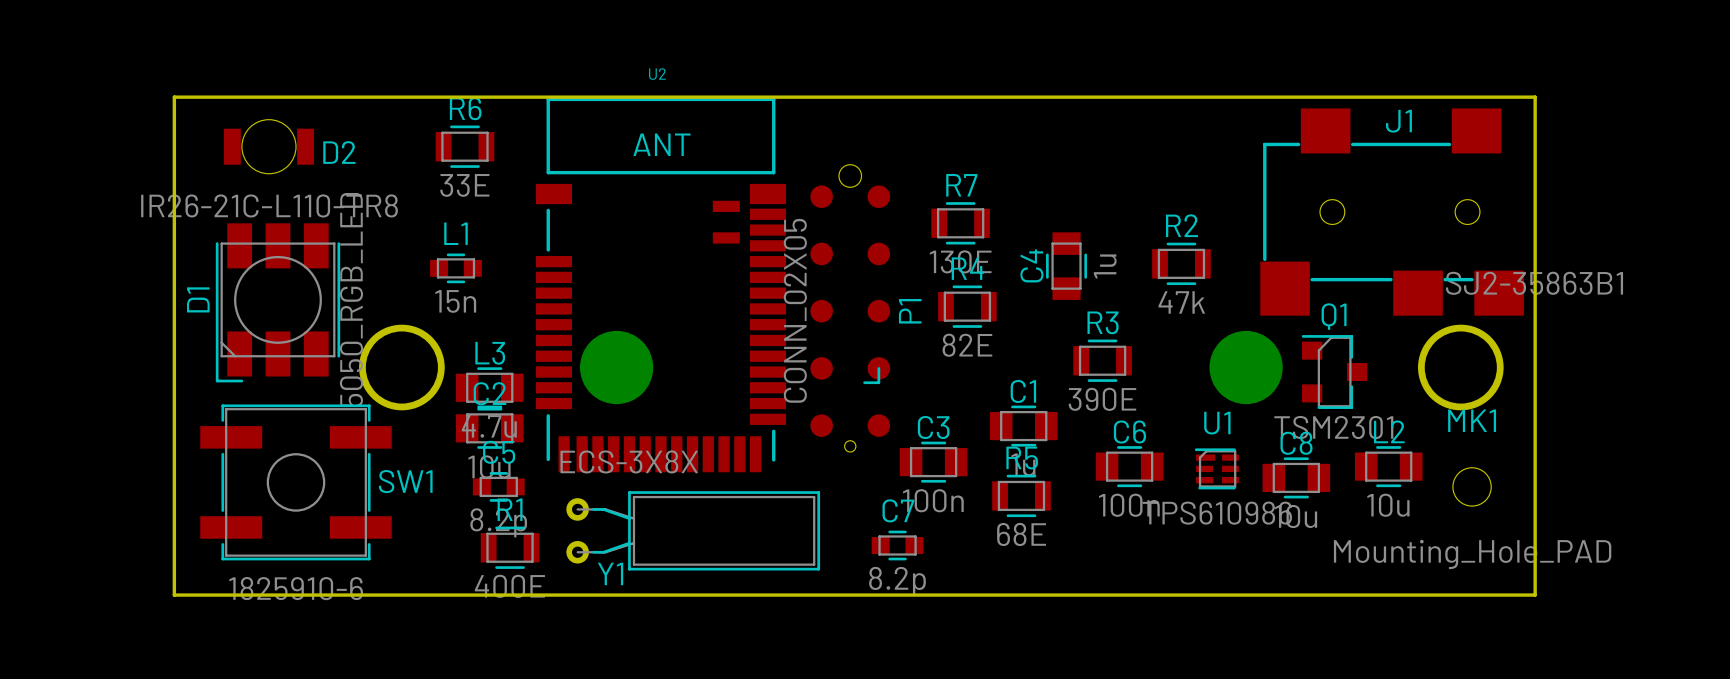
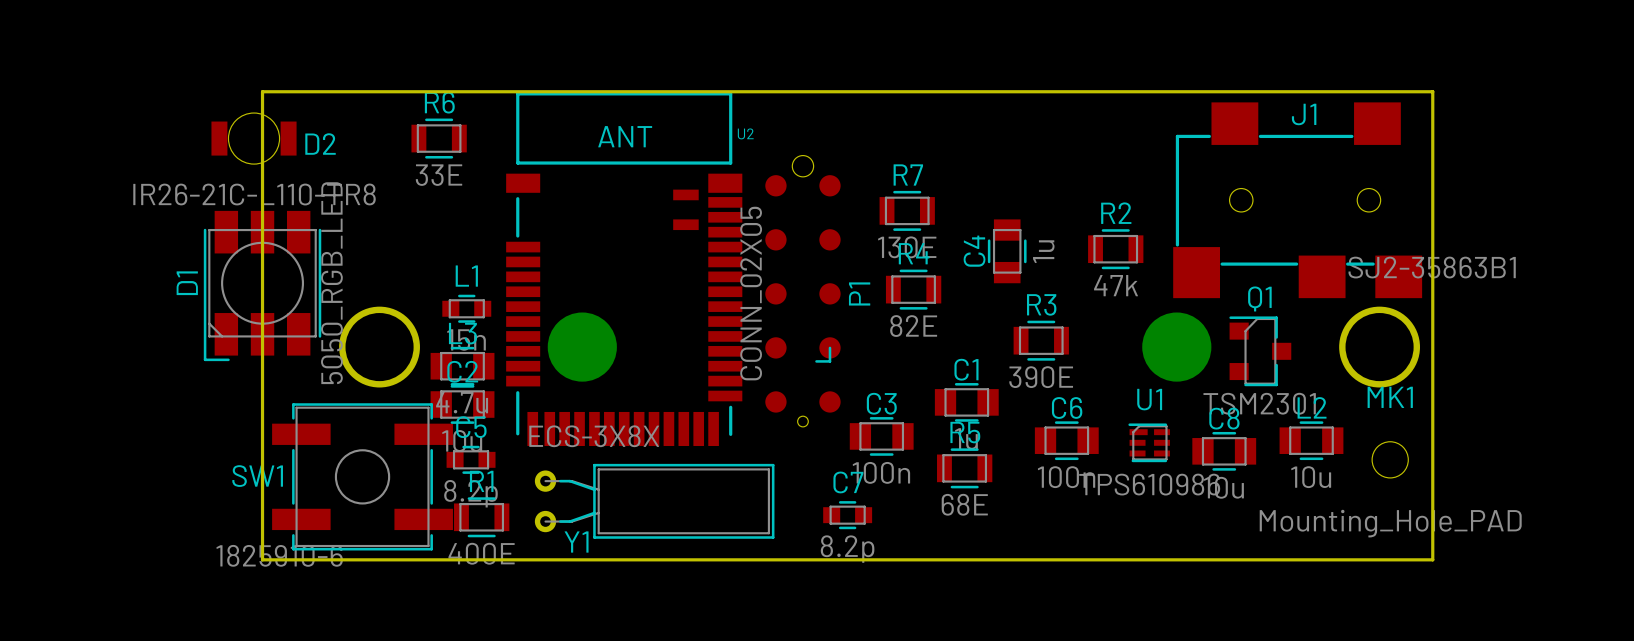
U2 name position: U2 (657, 74) -> U2 (745, 133)
board edge: (277, 97) (174, 97) (174, 595) (1535, 595) (1535, 97) (1517, 97) -> (262, 91) (262, 559) (1432, 559) (1432, 91)
J1 position: (1392, 212) -> (1297, 200)
L1 position: (455, 268) -> (466, 308)
SW1 name position: SW1 (405, 481) -> SW1 (257, 476)
SW1 position: (296, 482) -> (362, 476)

